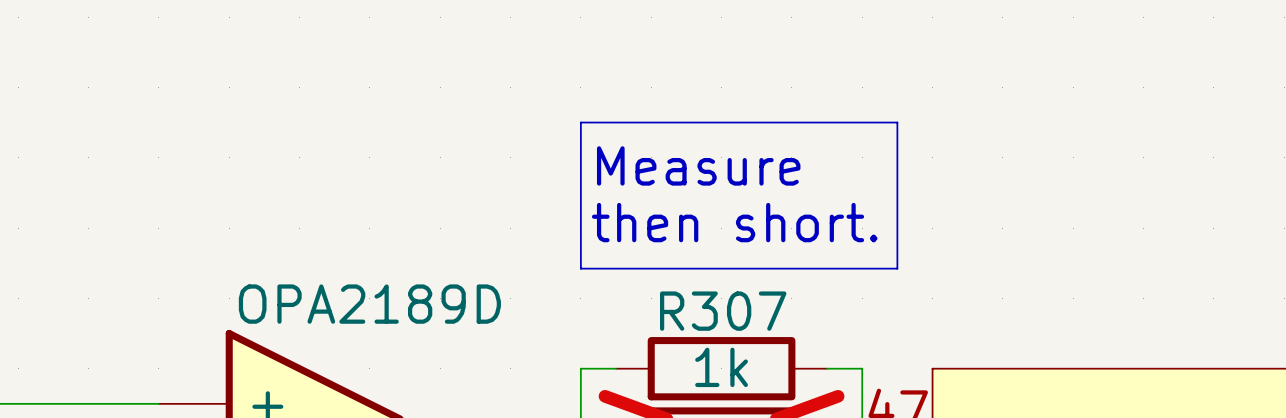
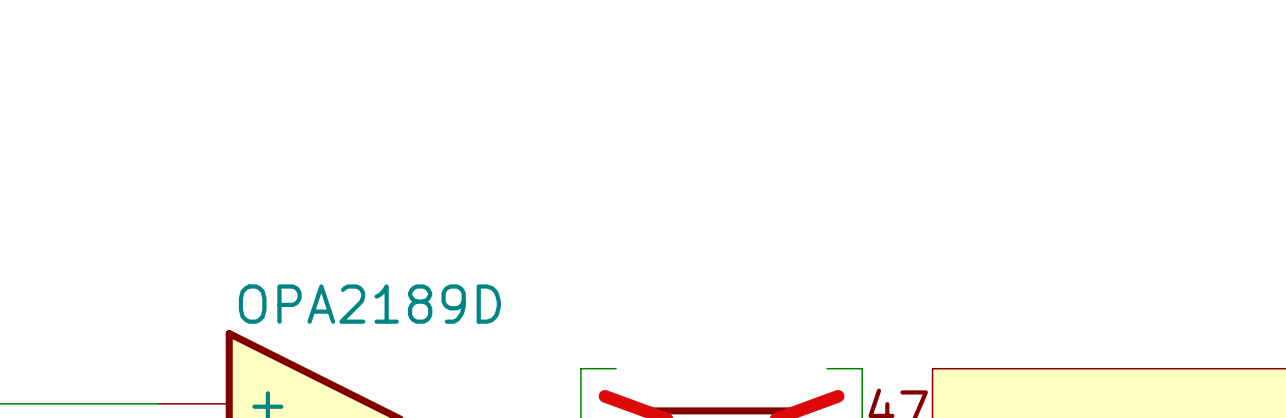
line: (580, 122) (897, 122) (897, 268) (580, 268) (580, 122) -> none
text: Measure (698, 165) -> none
text: then short. (734, 222) -> none
R307: 1k (721, 368) -> none

